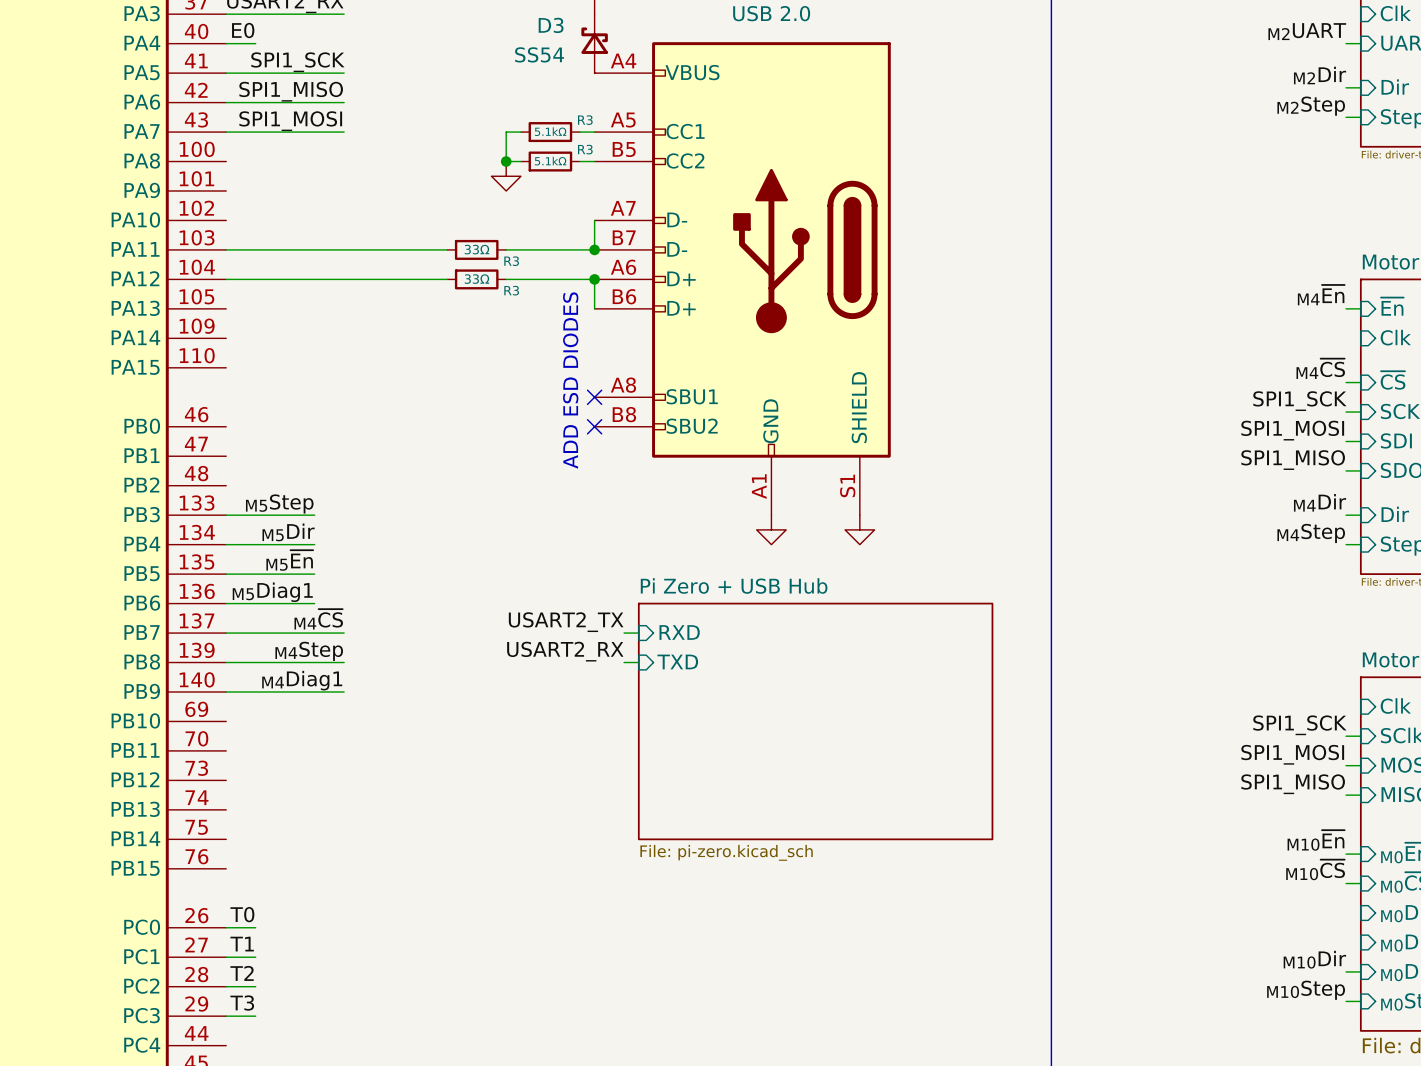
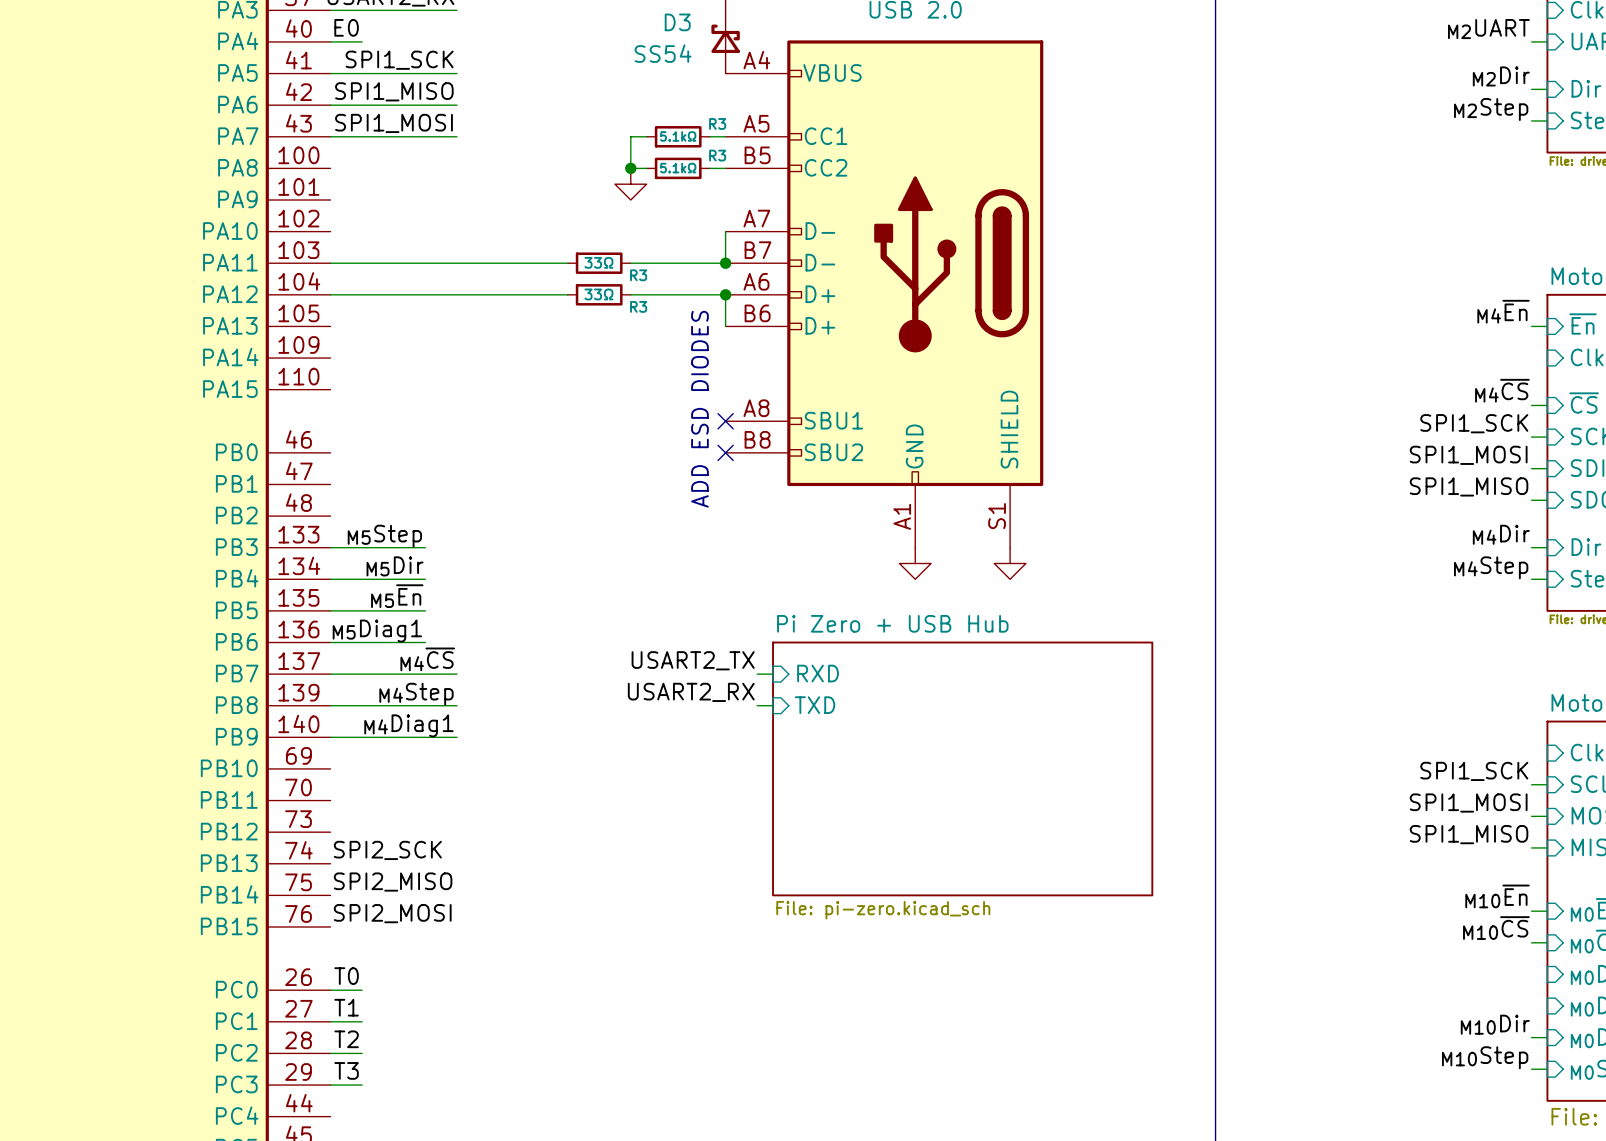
label: none -> SPI2_SCK (387, 850)
label: none -> SPI2_MISO (393, 882)
label: none -> SPI2_MOSI (392, 913)

